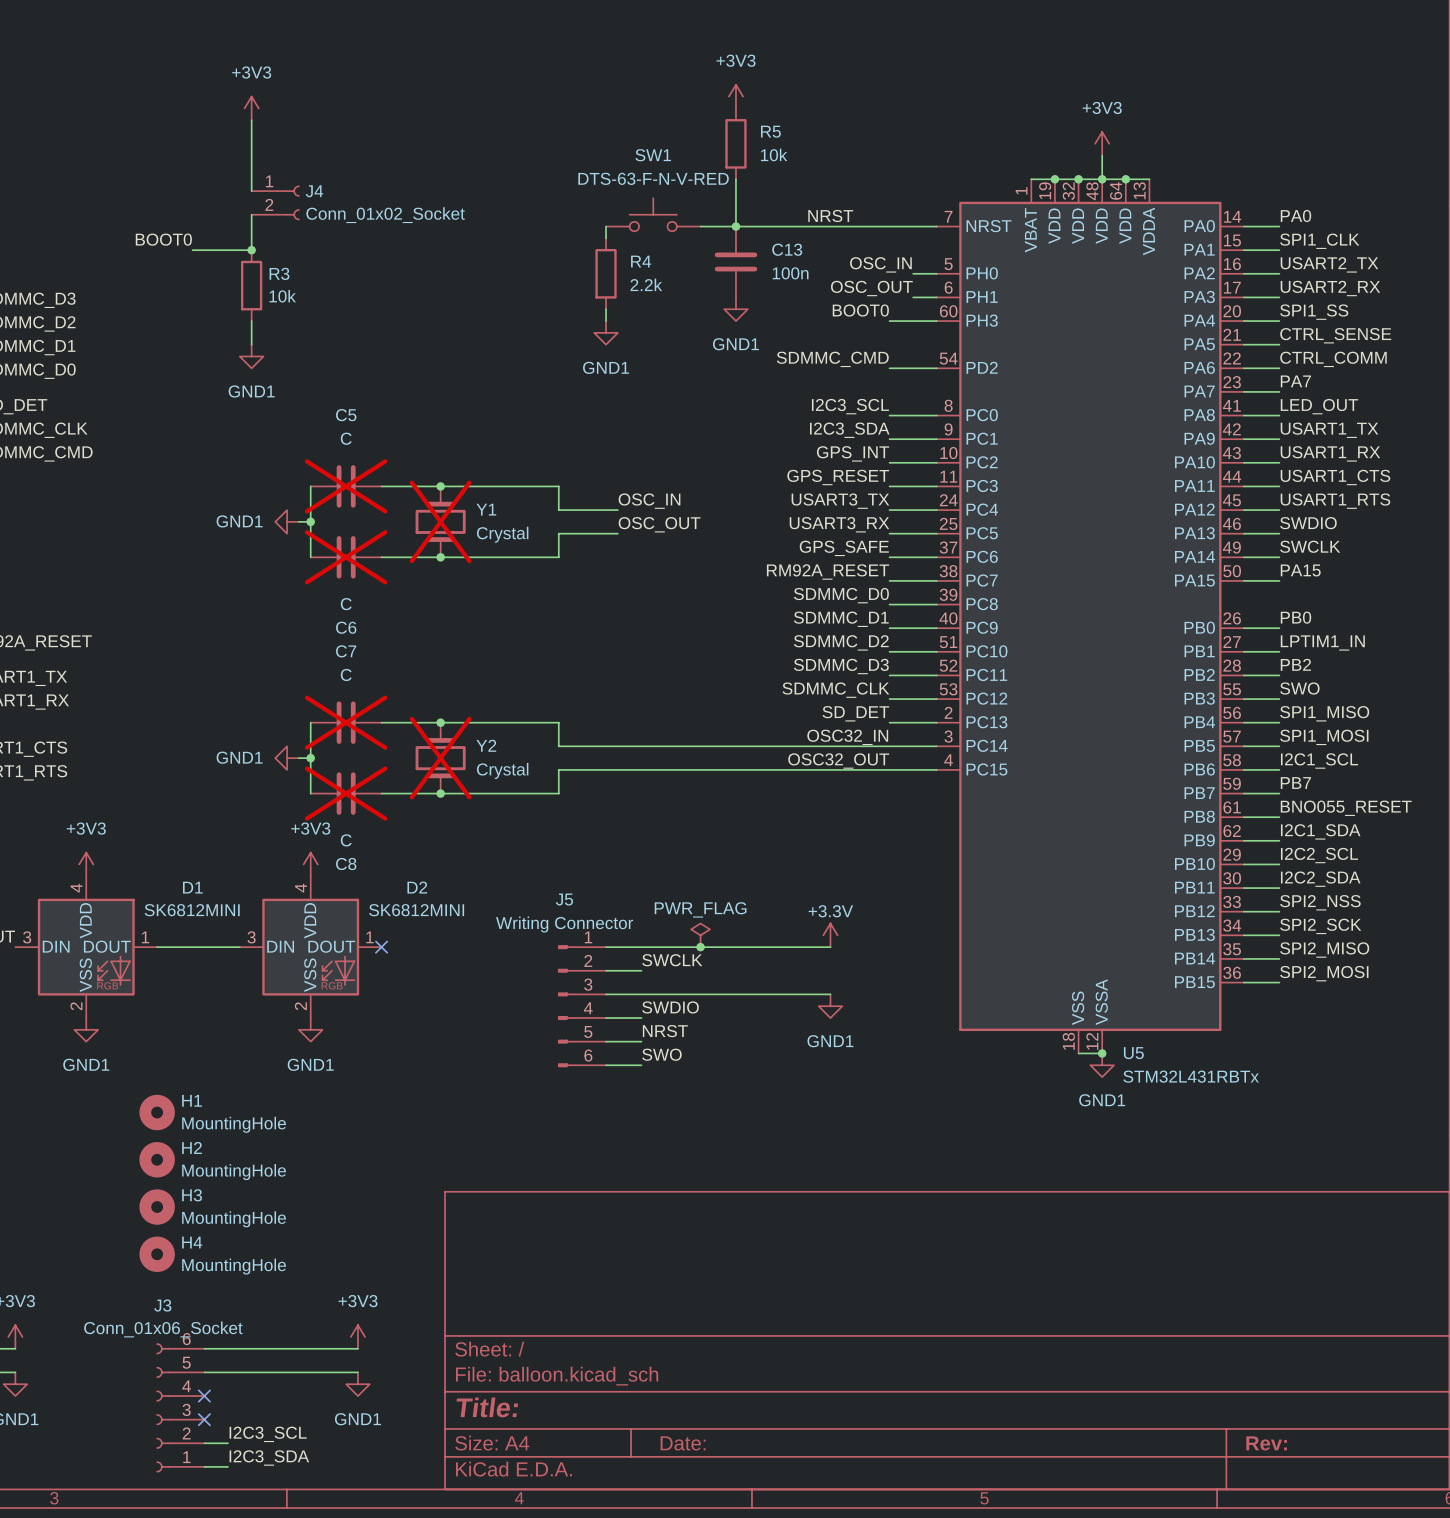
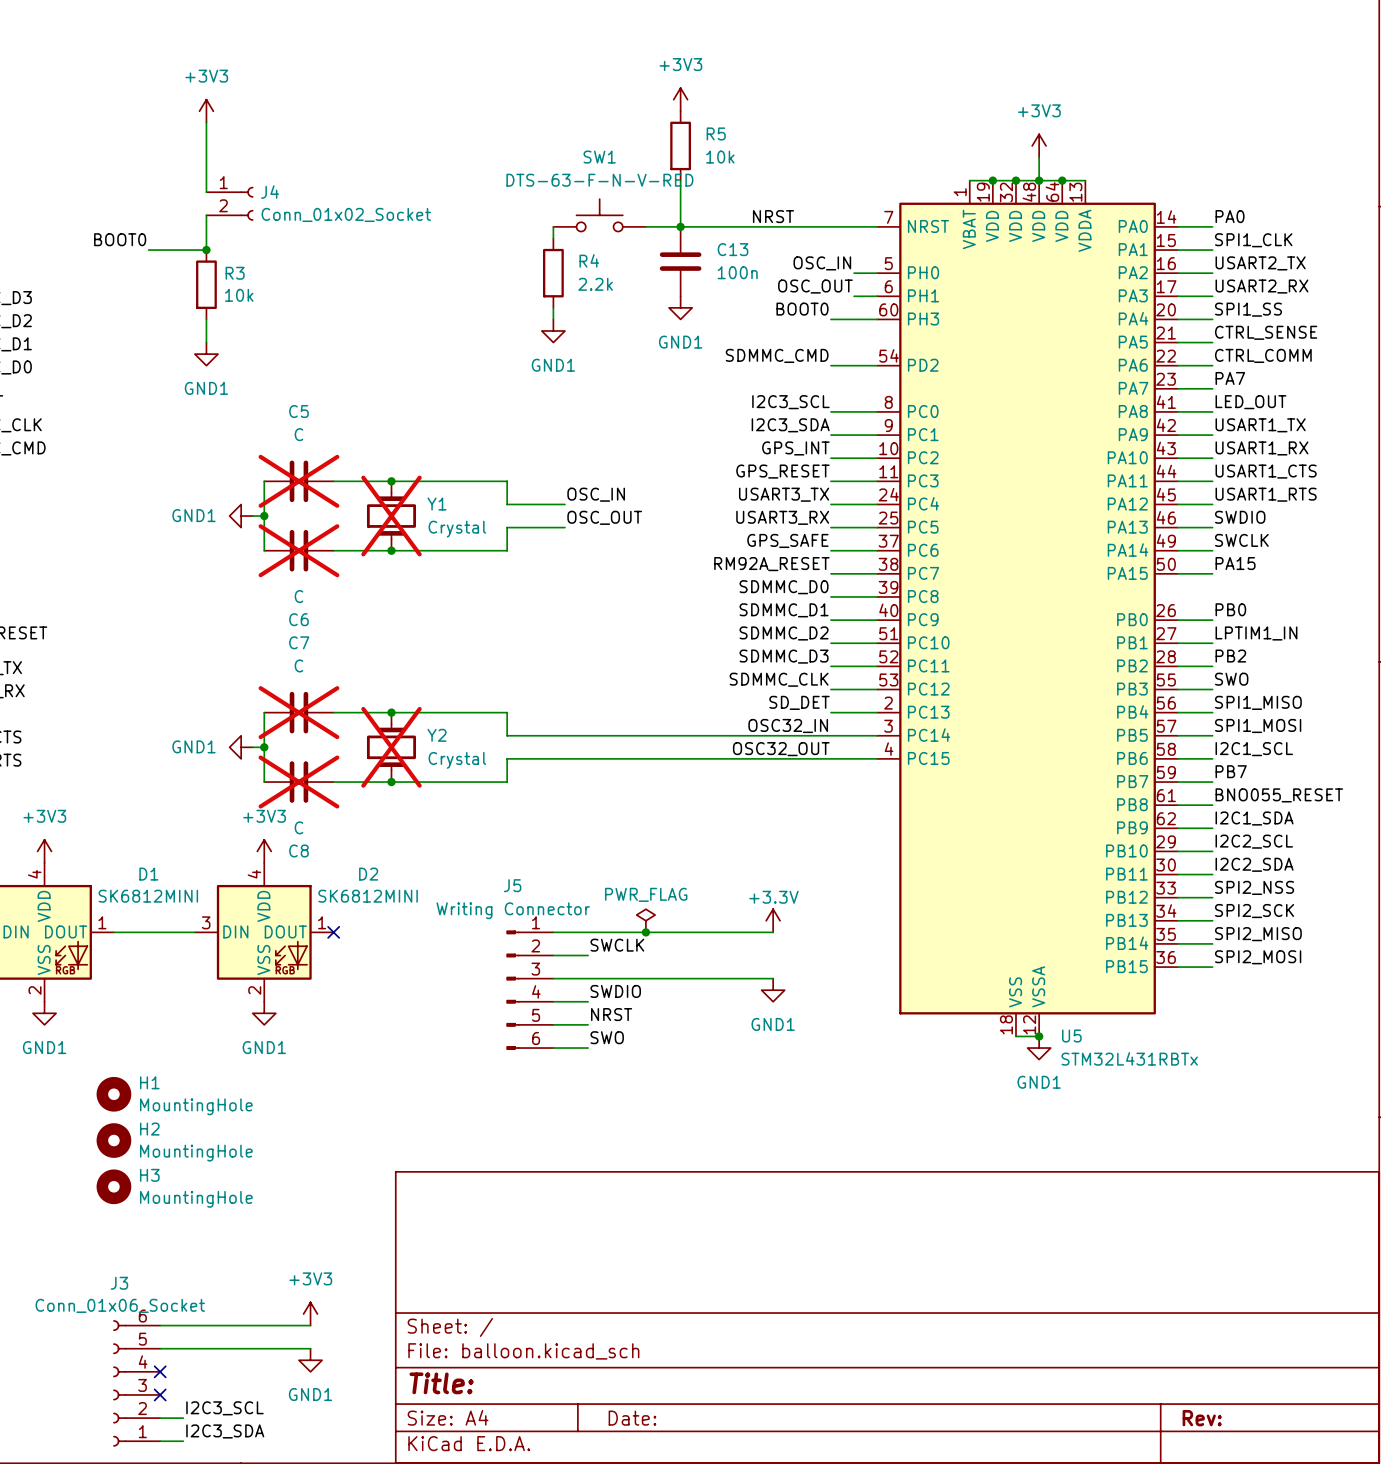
H4: MountingHole (157, 1254) -> none

